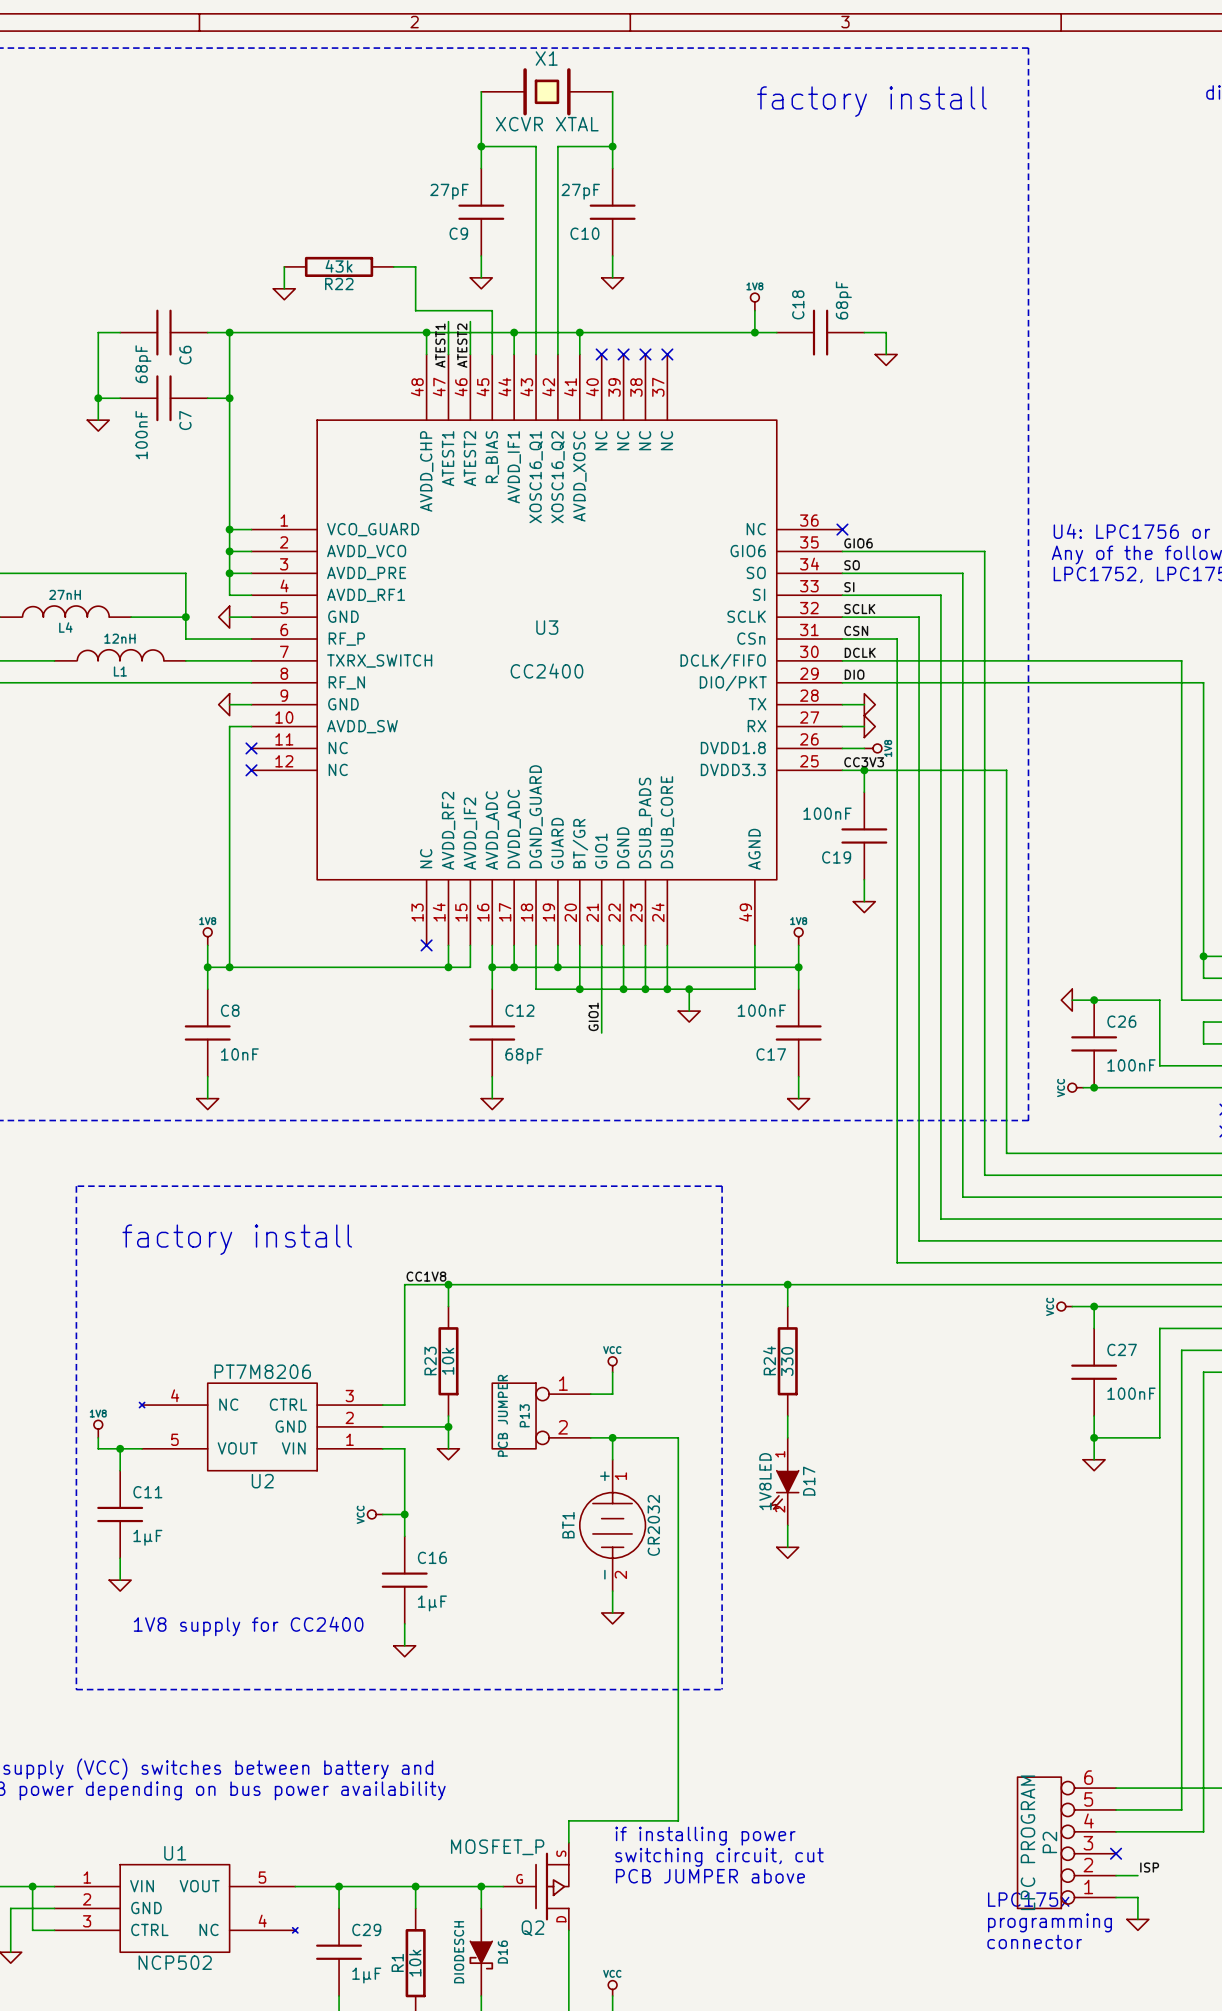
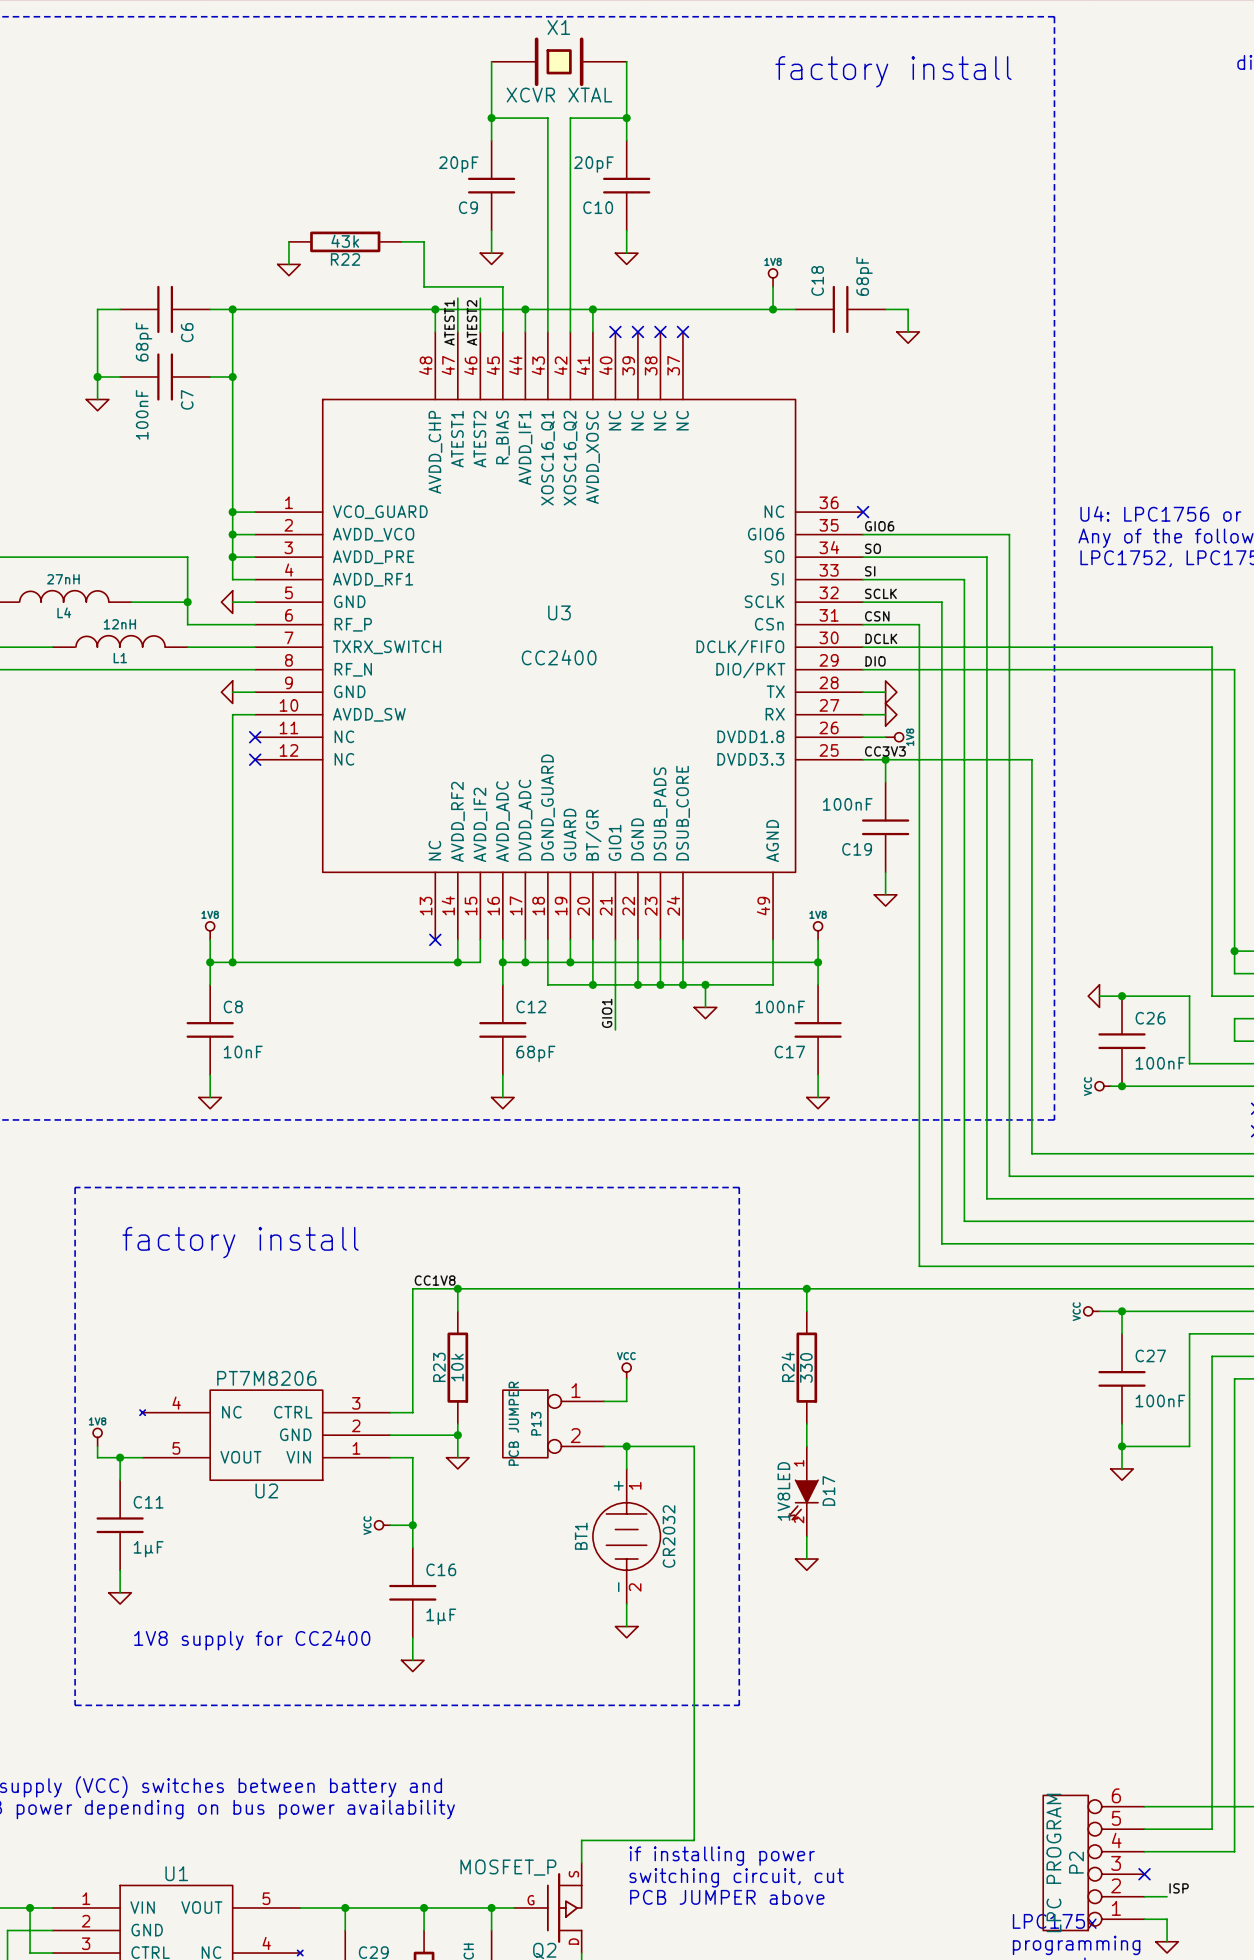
C9 value: 27pF (449, 191) -> 20pF (458, 164)
C10 value: 27pF (580, 191) -> 20pF (593, 164)

